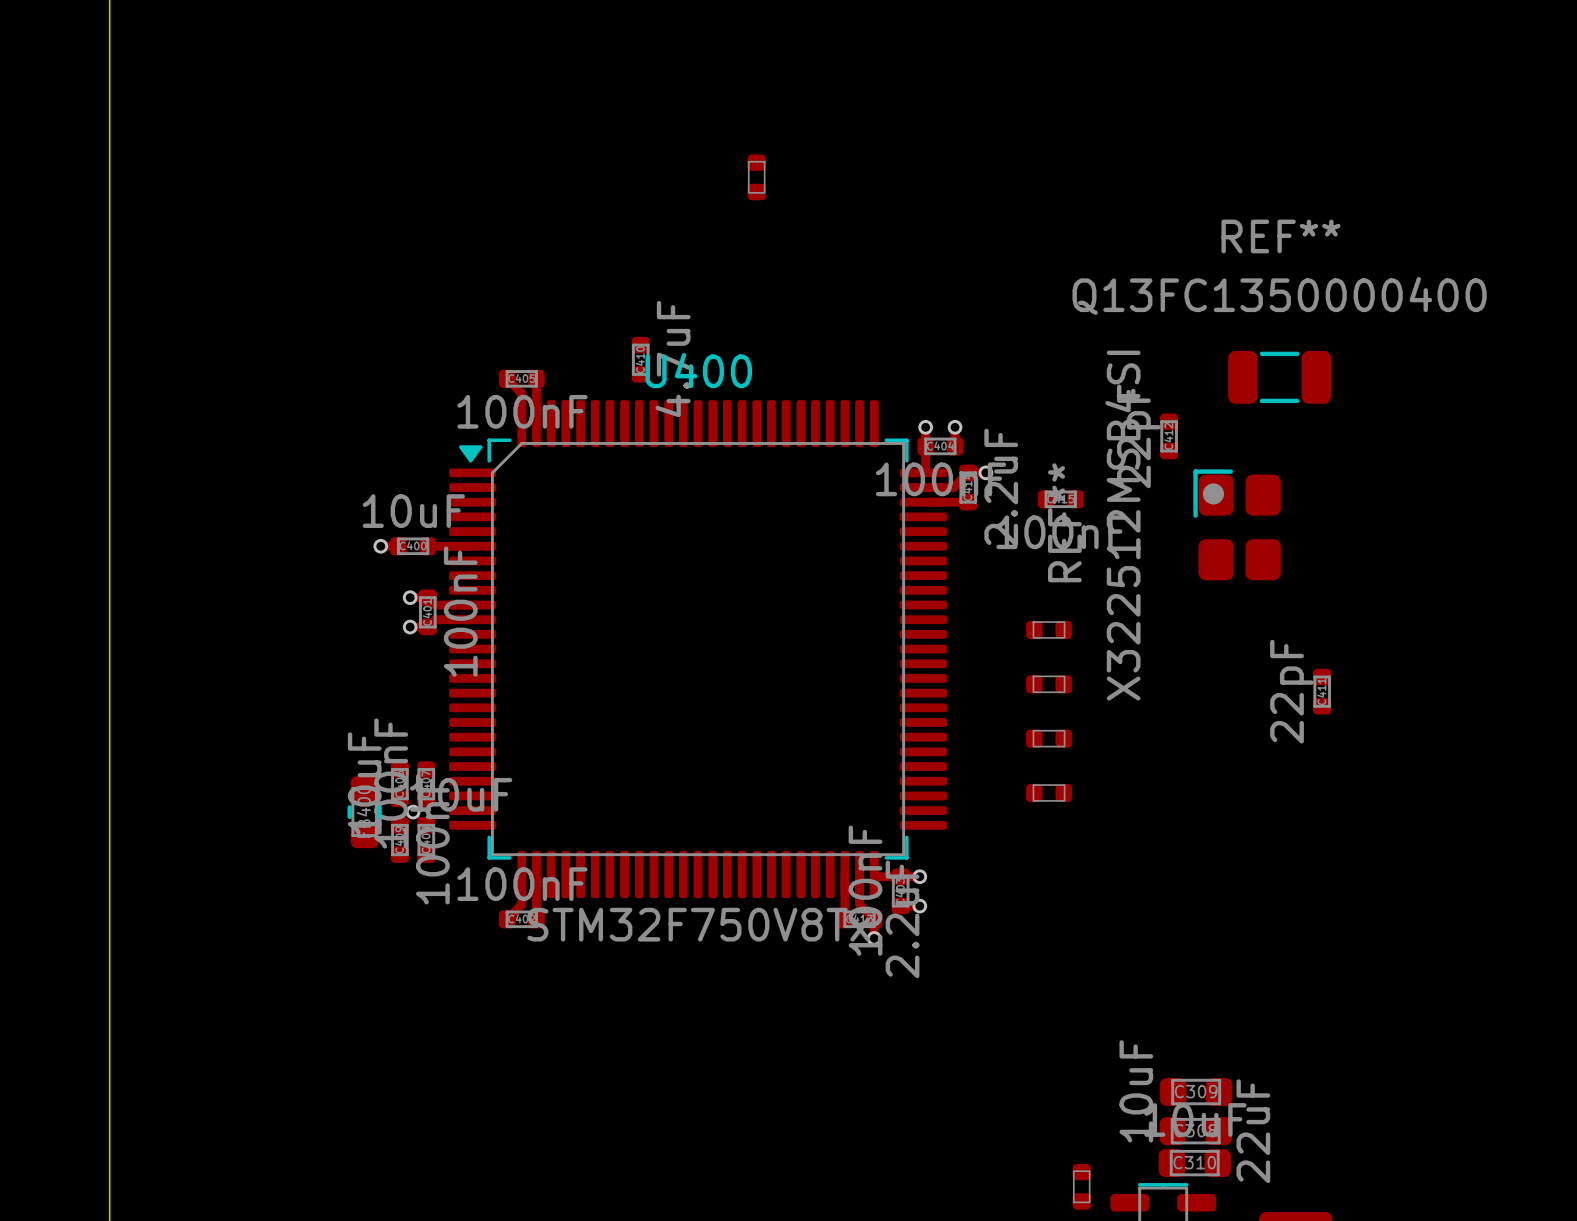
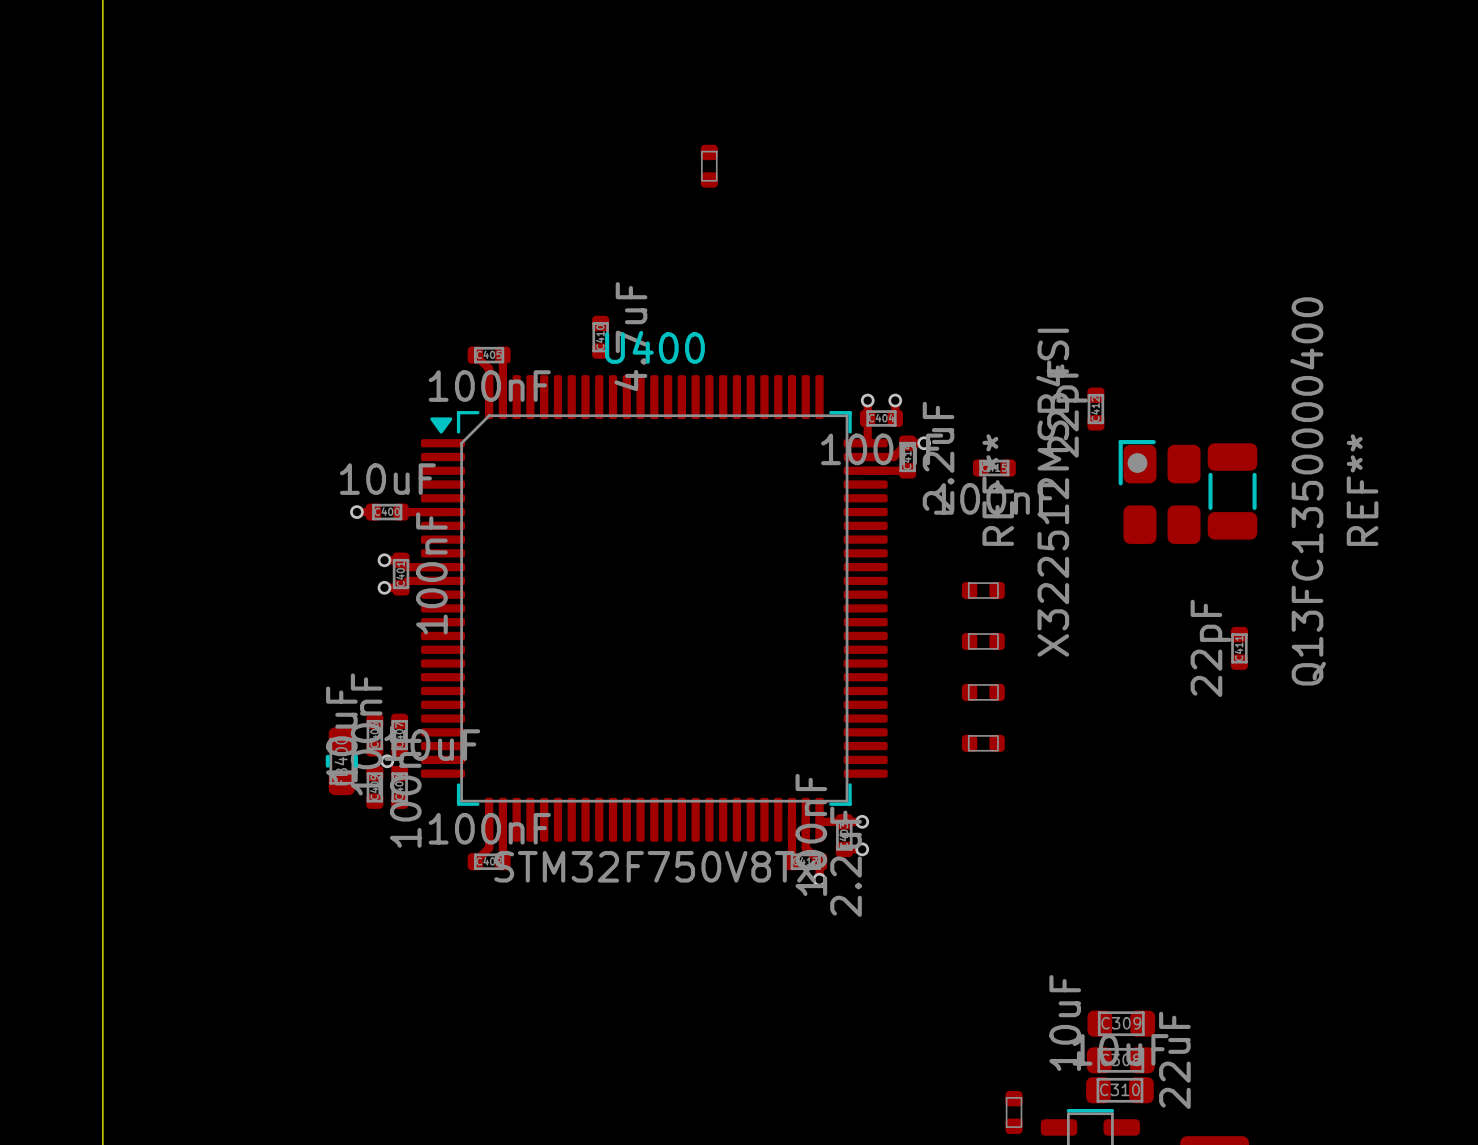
part rotation: 0° (1279, 377) -> 90° clockwise (1232, 491)
part position: (1279, 377) -> (1232, 491)

